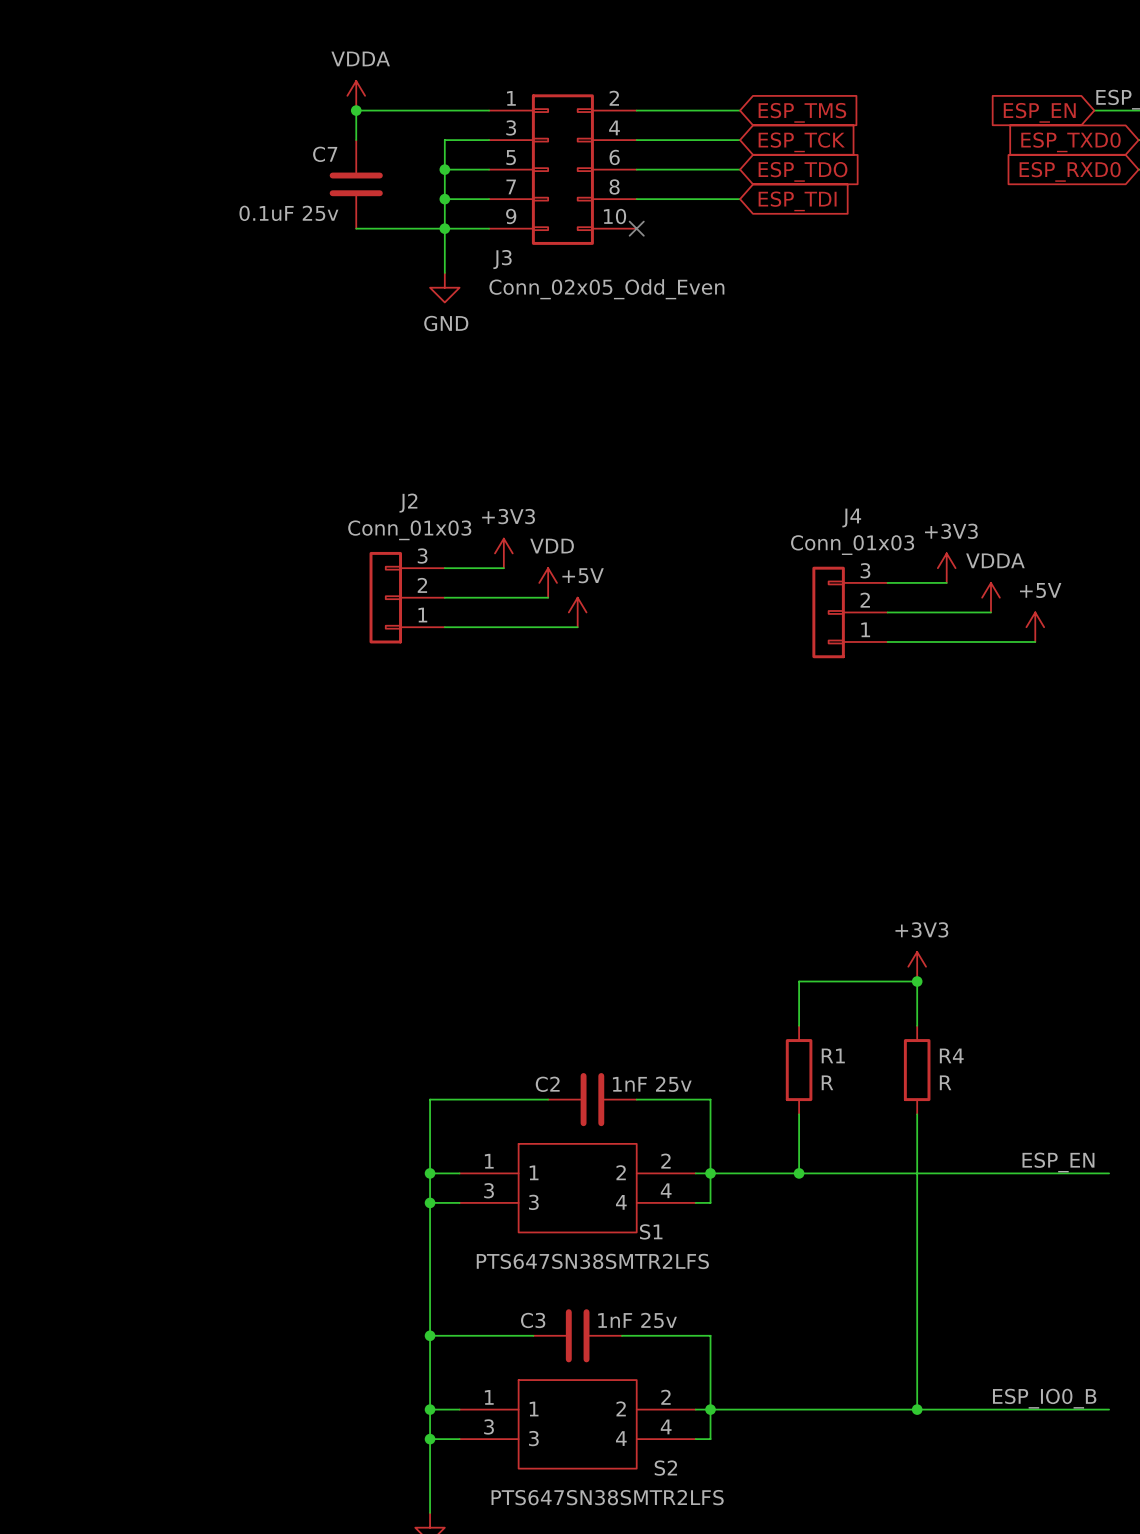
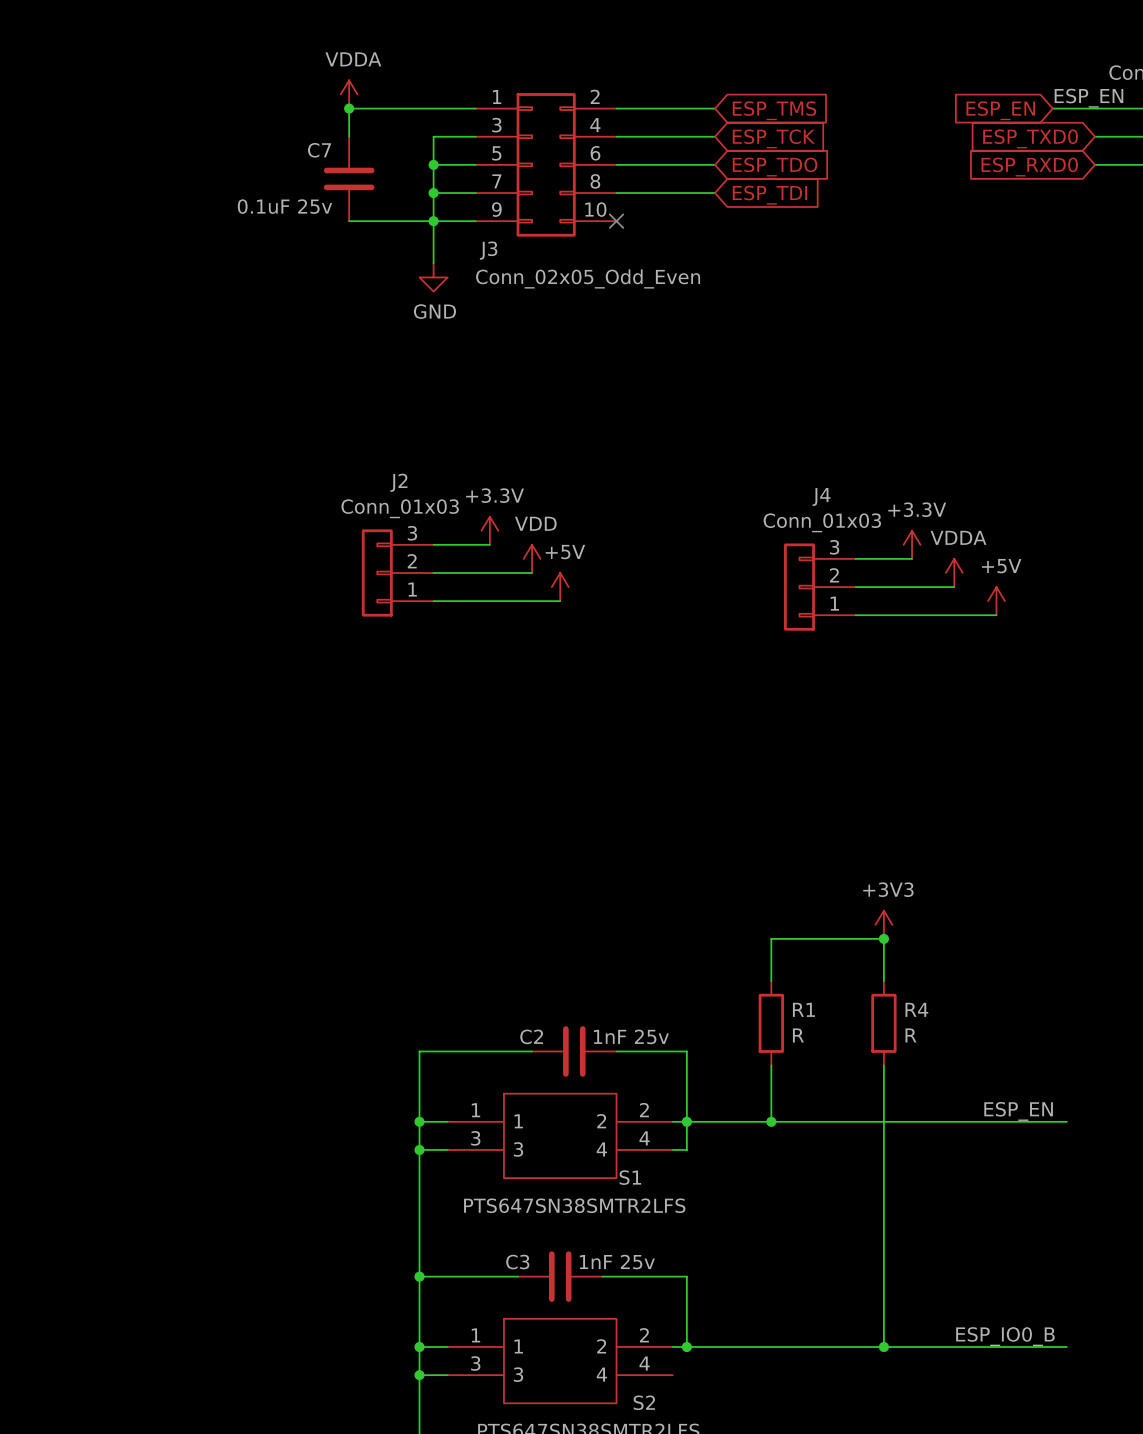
power symbol: +3V3 (503, 553) -> +3.3V (489, 530)
power symbol: +3V3 (946, 568) -> +3.3V (912, 544)
wire: (710, 1409) (710, 1439) (695, 1439) -> none

